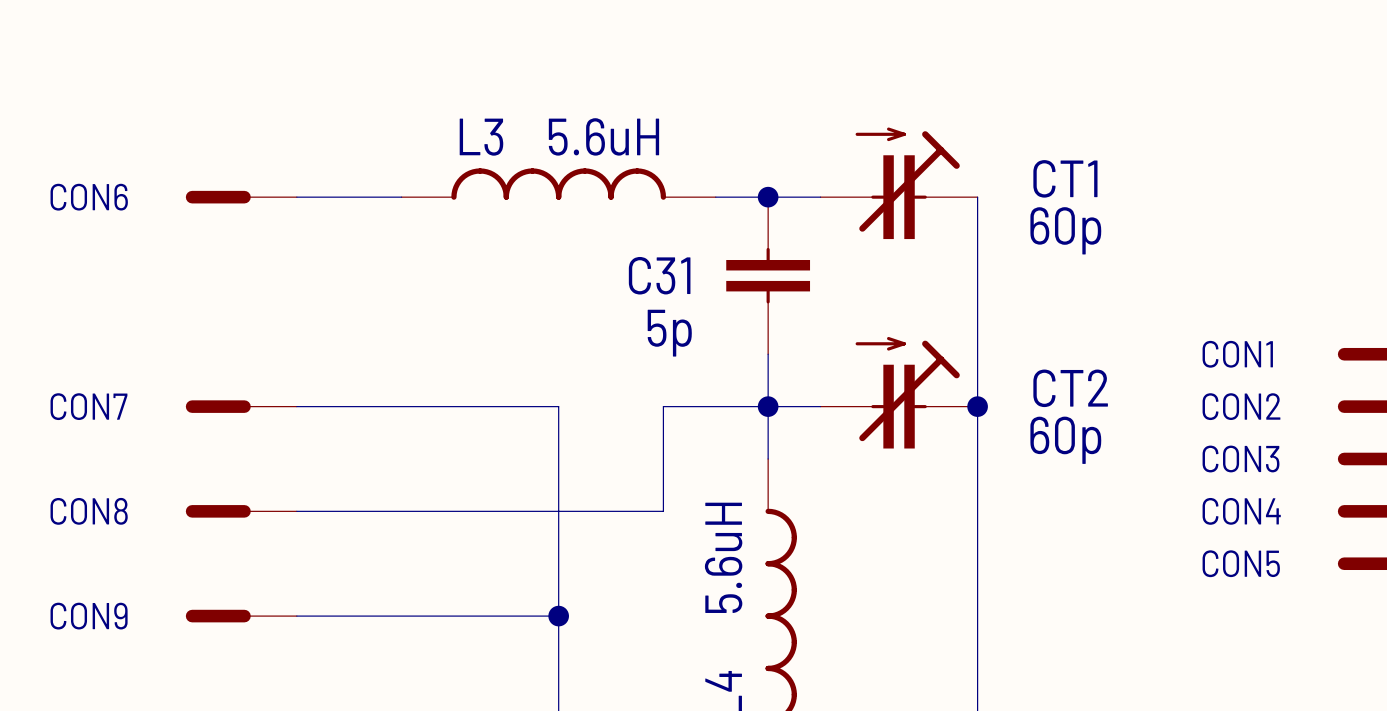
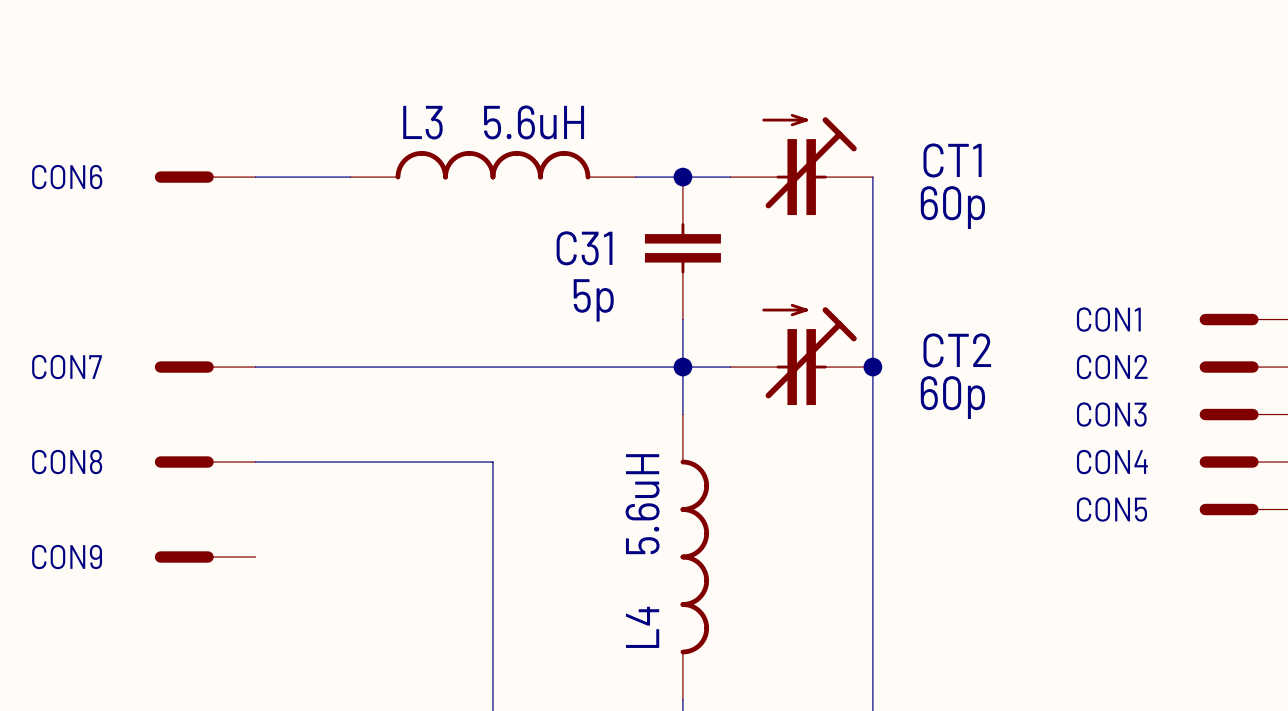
wire: (558, 406) (558, 511) (663, 511) (663, 406) -> (492, 367) (587, 367)
wire: (296, 616) (558, 616) -> none
junction: (558, 616) -> none

